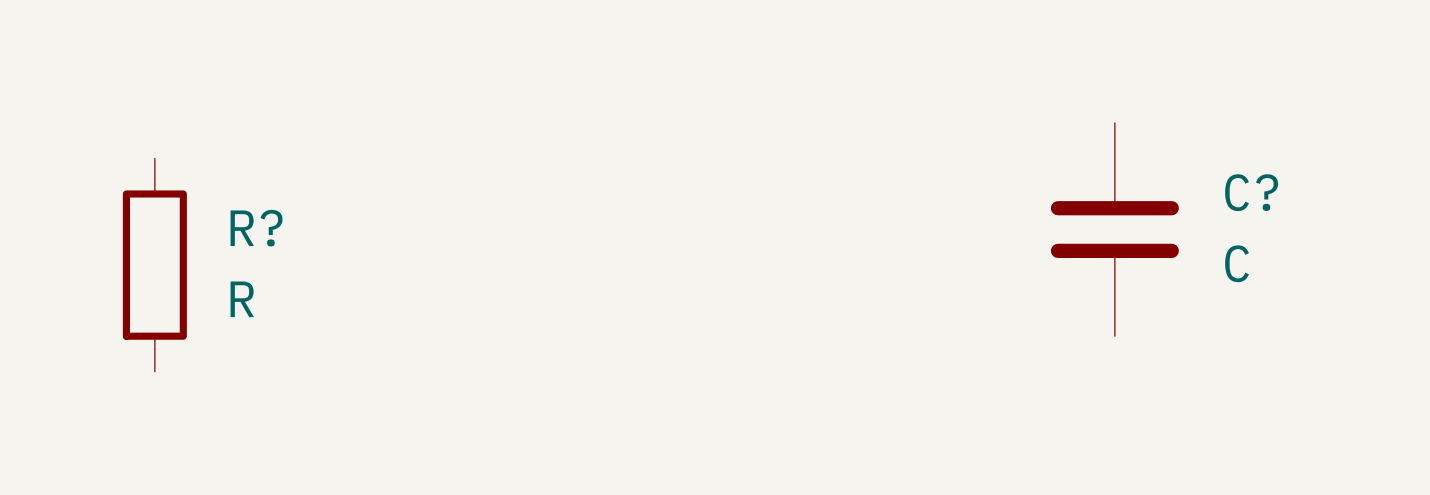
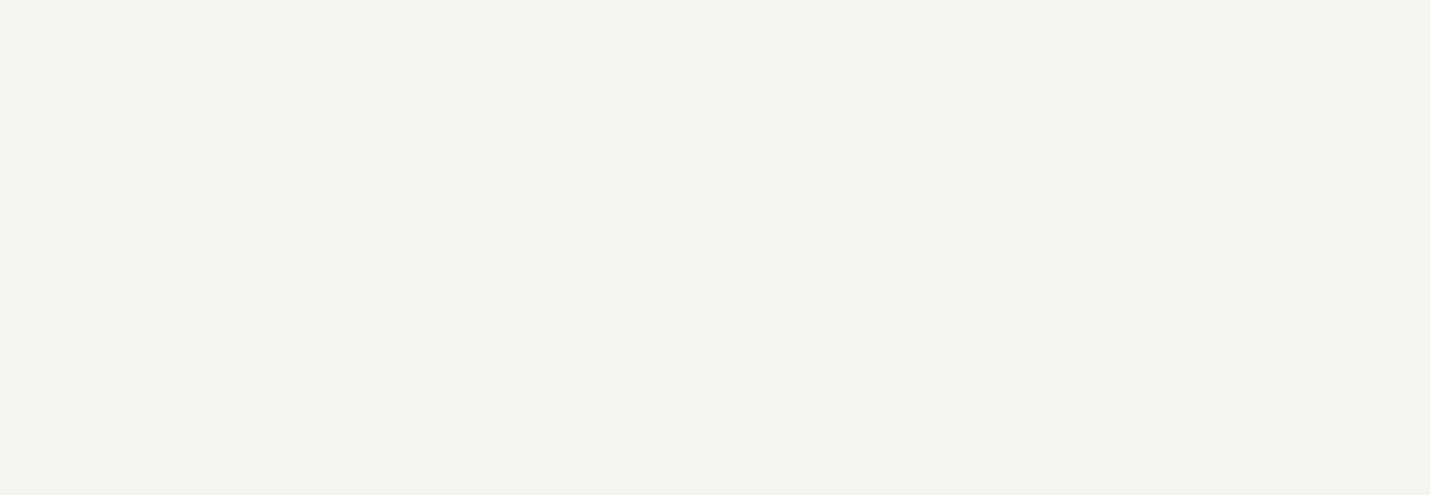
C?: C (1114, 229) -> none
R?: R (154, 265) -> none

